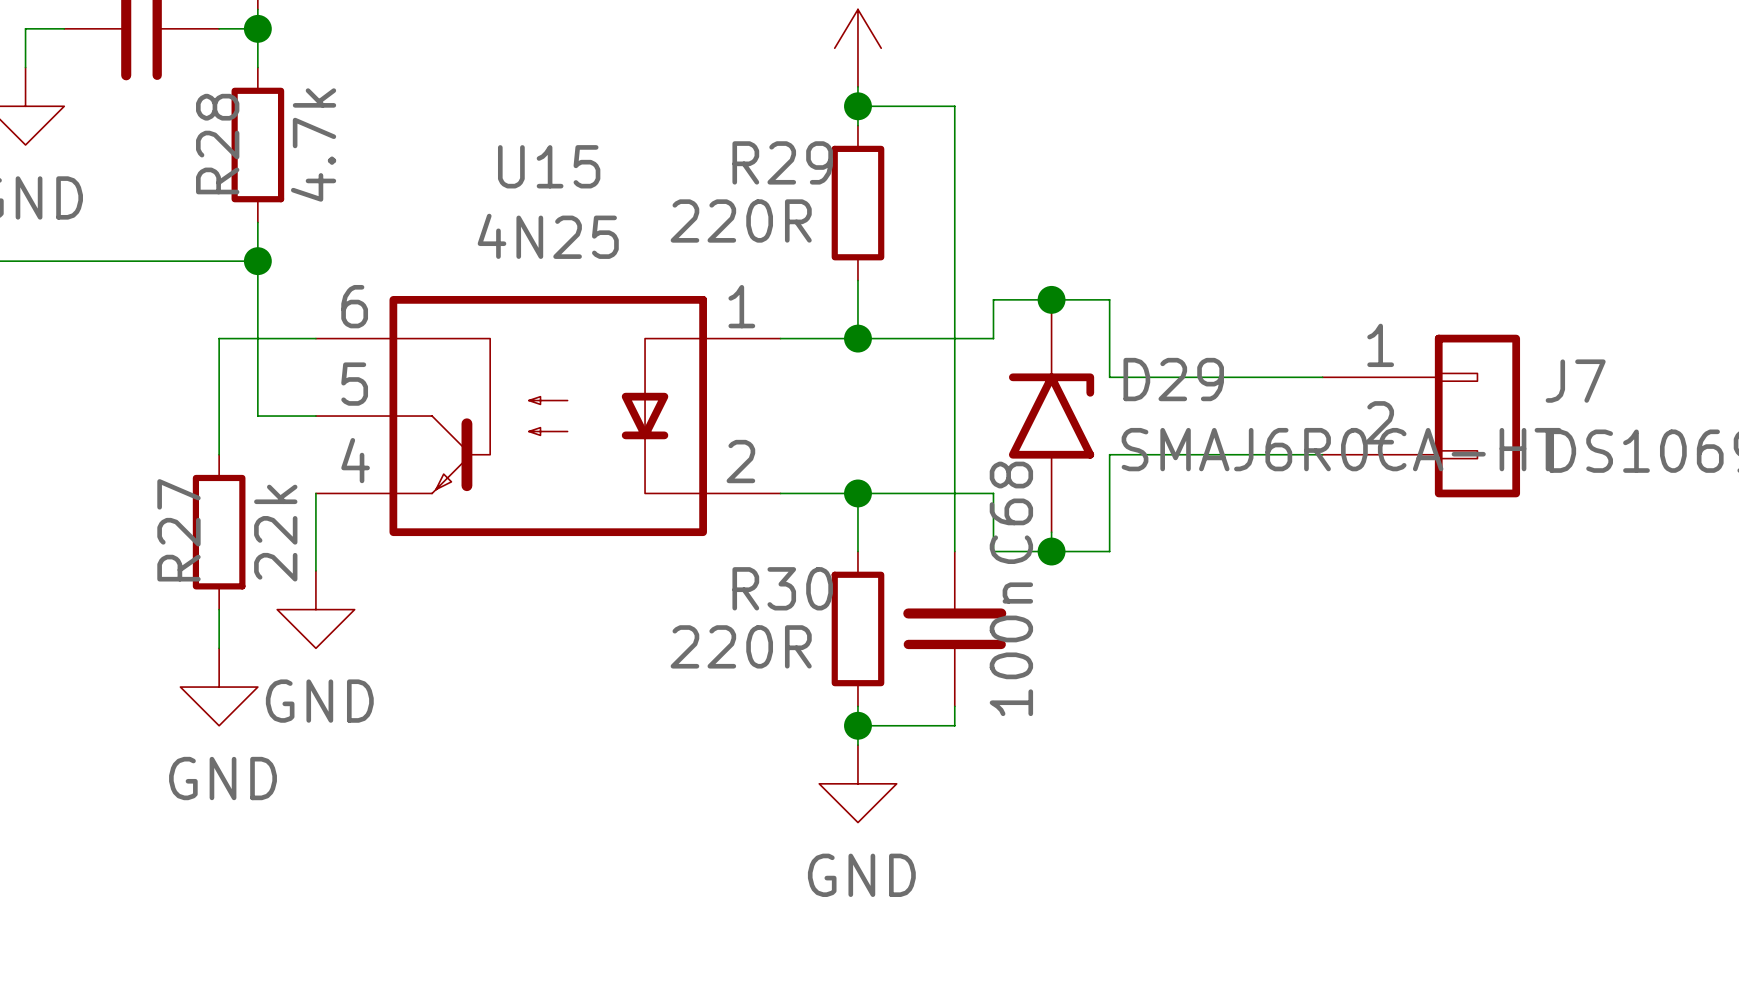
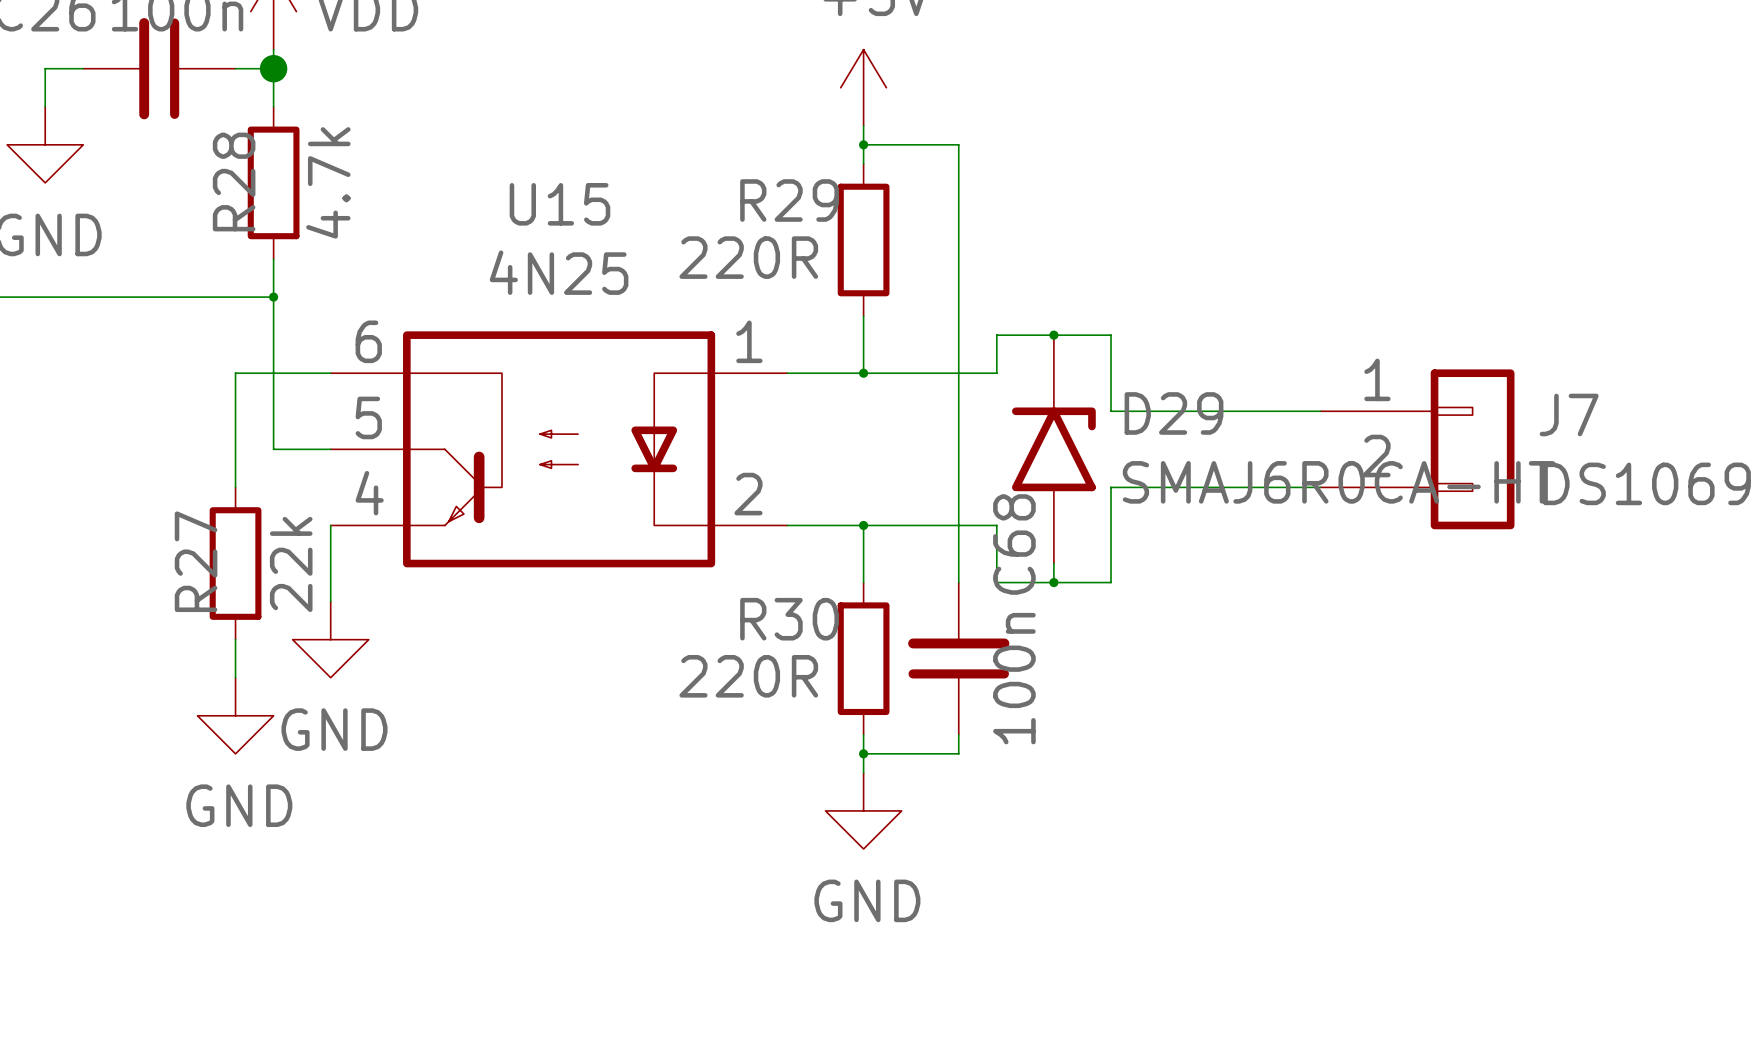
junction size: [844, 92, 872, 121] -> [859, 140, 869, 150]
junction size: [243, 247, 272, 276] -> [269, 292, 279, 302]
junction size: [1037, 285, 1066, 314] -> [1049, 330, 1059, 340]
junction size: [844, 324, 872, 353] -> [859, 368, 869, 378]
junction size: [844, 479, 872, 508] -> [859, 520, 869, 531]
junction size: [1037, 537, 1066, 566] -> [1049, 577, 1059, 588]
junction size: [844, 711, 872, 740] -> [859, 749, 869, 759]

